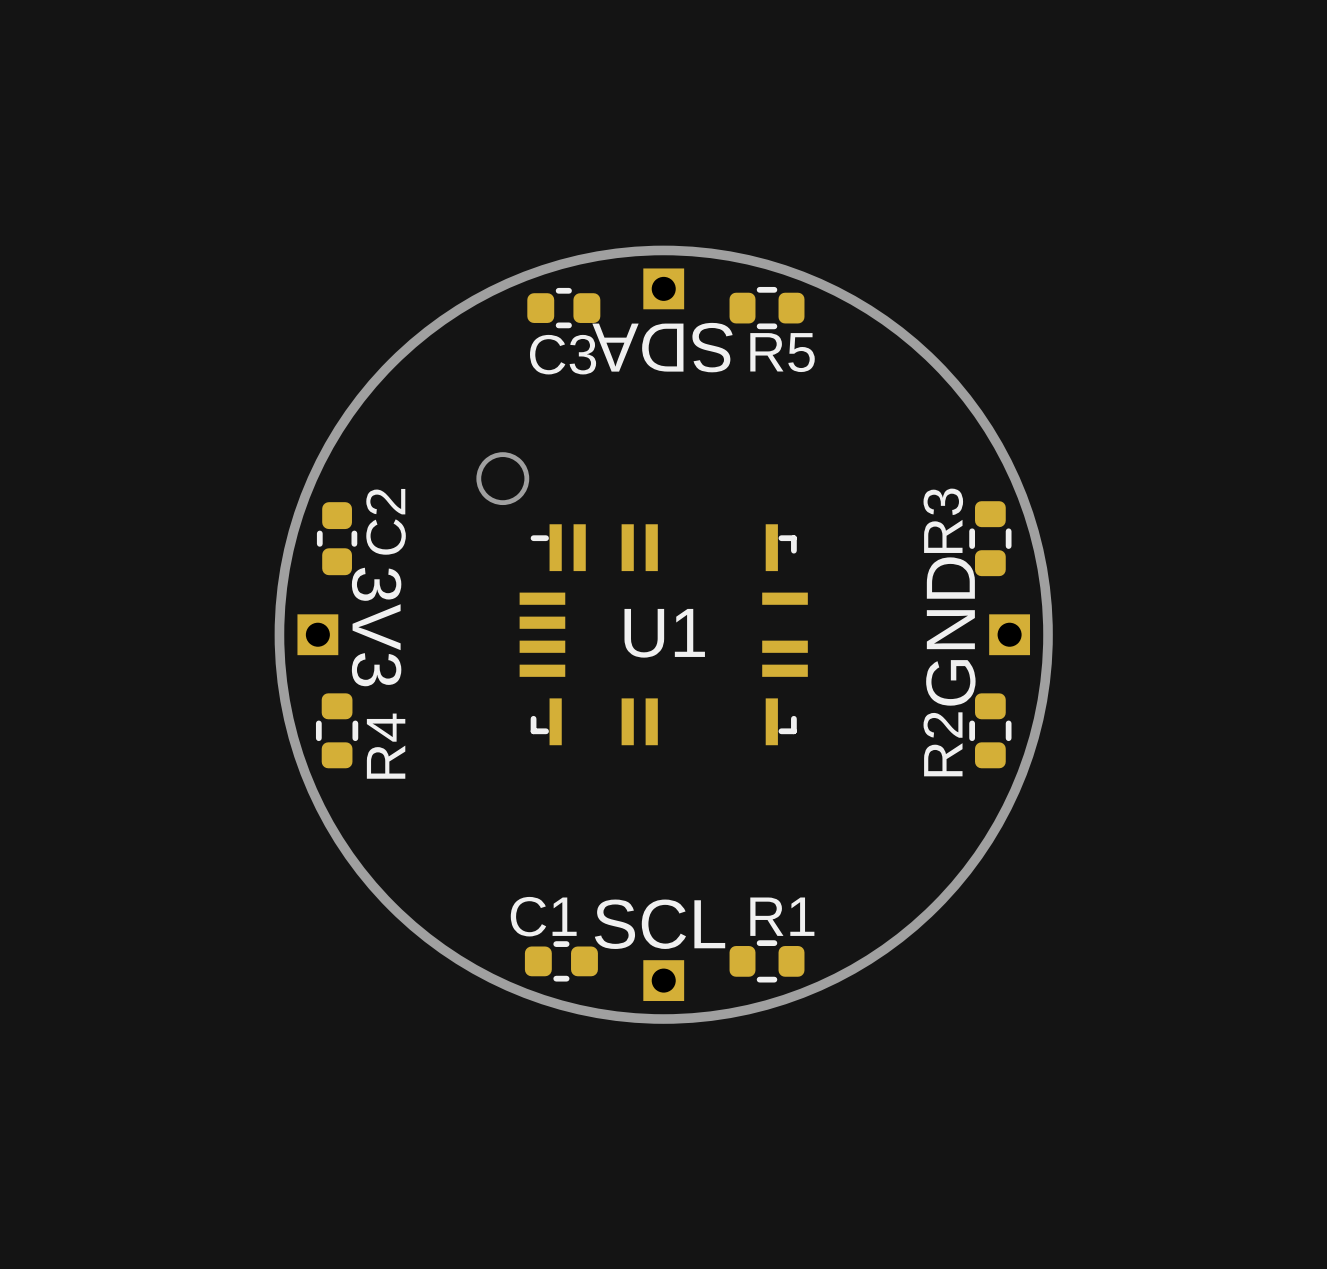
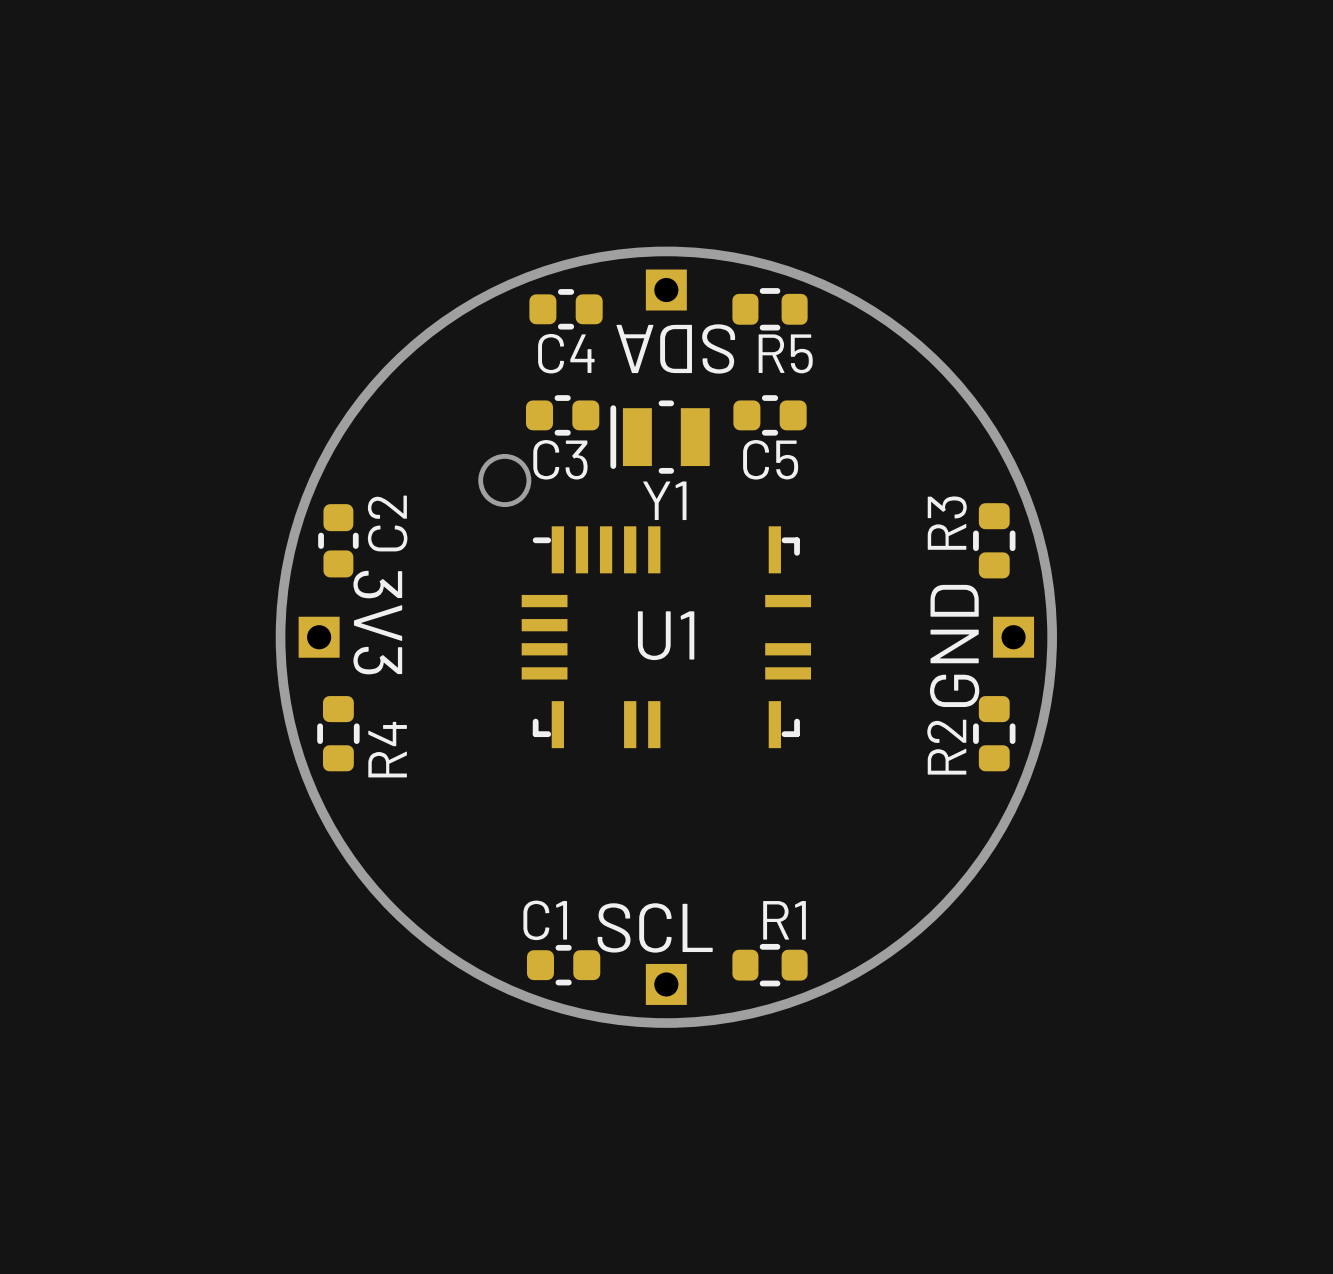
C3 name: C3 (563, 354) -> C4 (566, 353)
C3: none -> (562, 415)
C5: none -> (770, 415)
Y1: none -> (660, 437)
U1 footprint: [519, 524, 808, 746] -> [521, 526, 812, 749]

